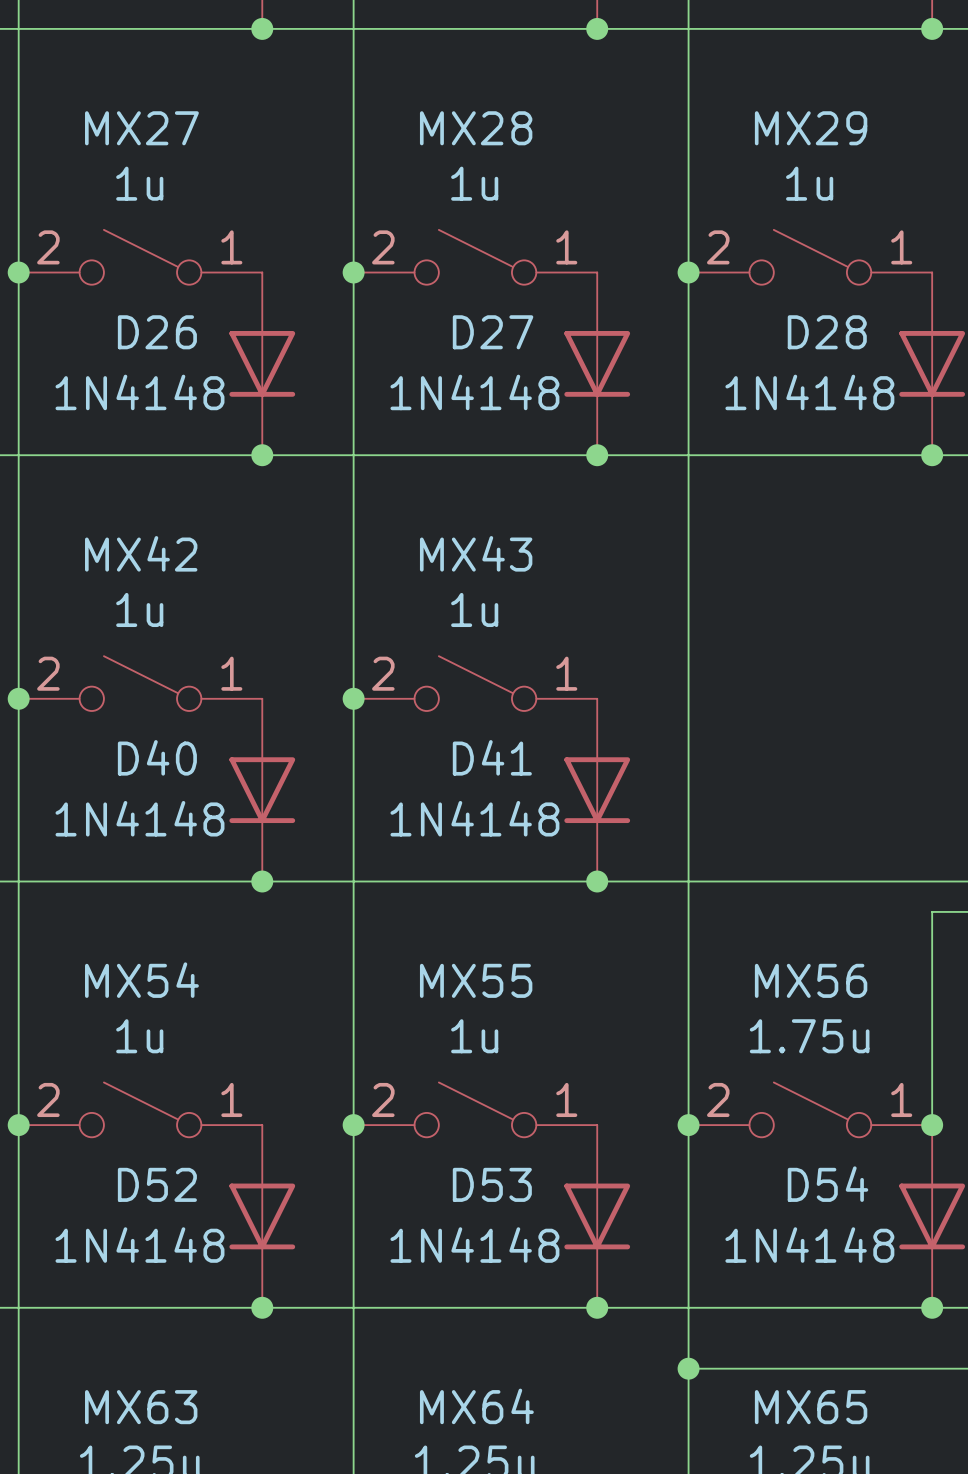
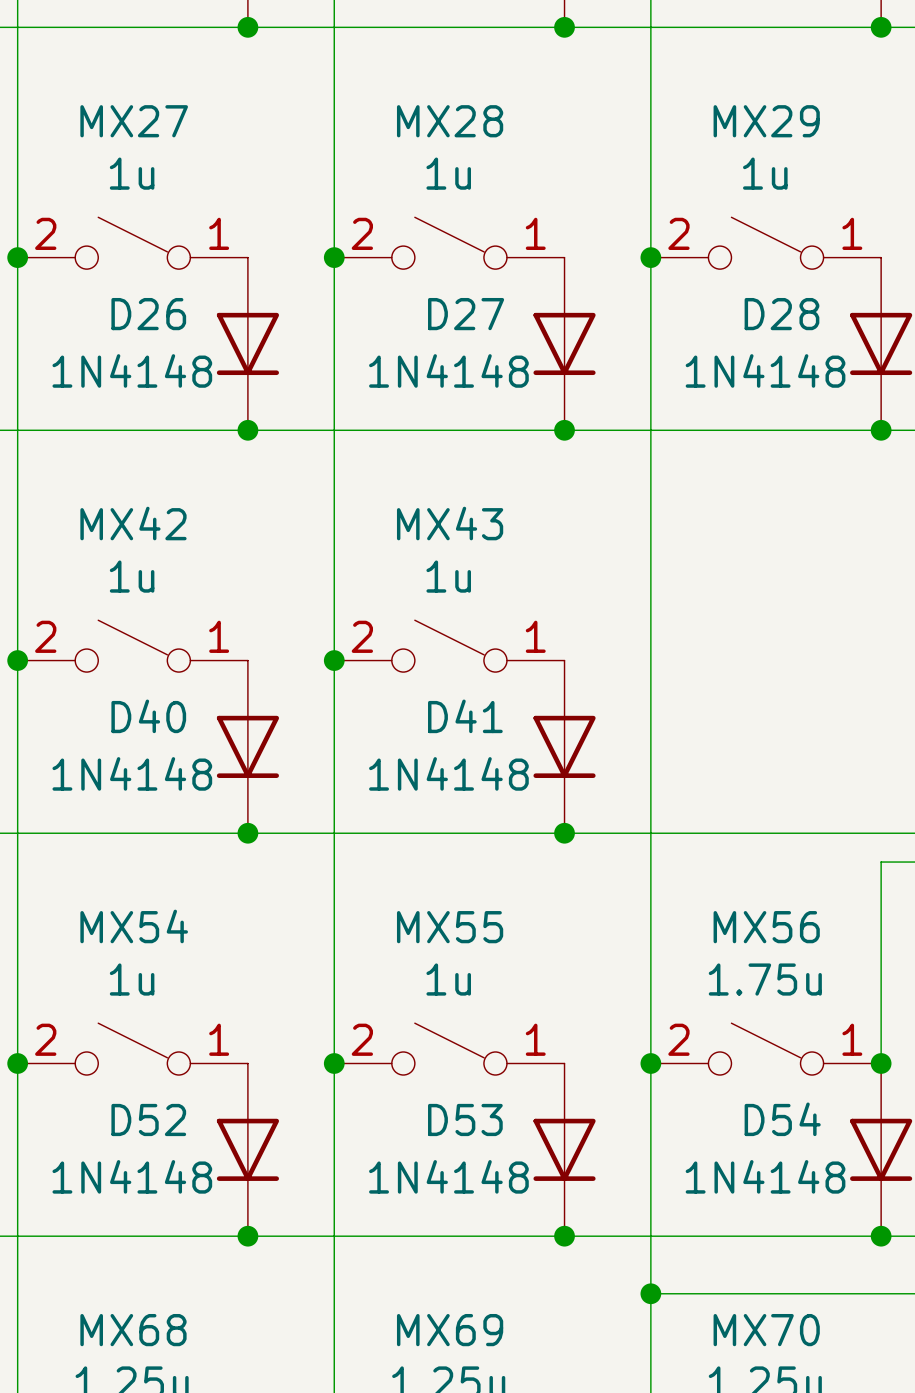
MX64 name: MX64 (476, 1406) -> MX69 (450, 1330)
MX63 name: MX63 (141, 1407) -> MX68 (133, 1330)
MX65 name: MX65 (811, 1407) -> MX70 (766, 1330)

